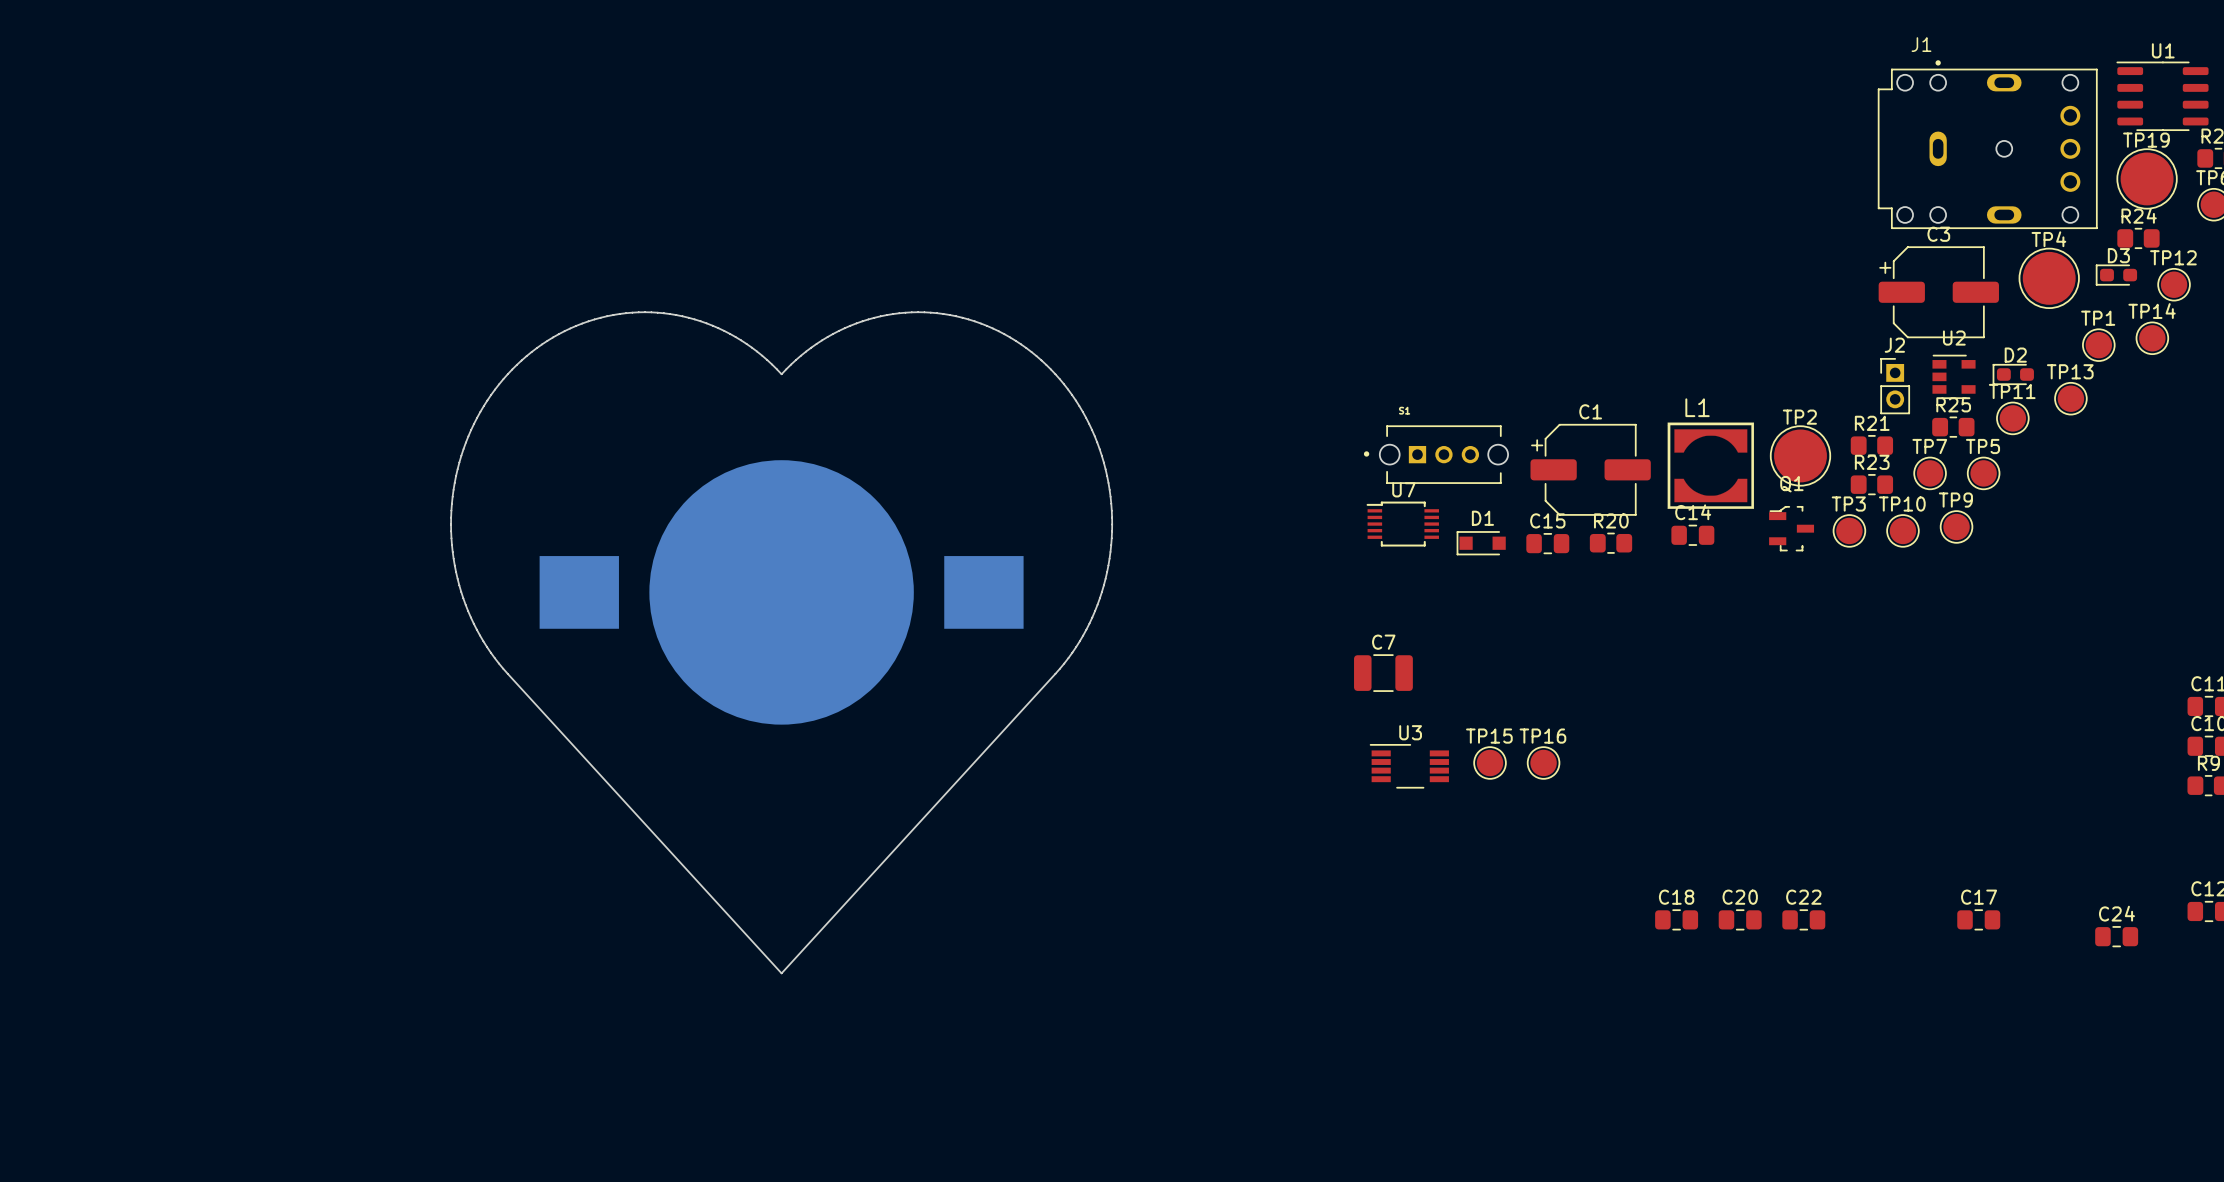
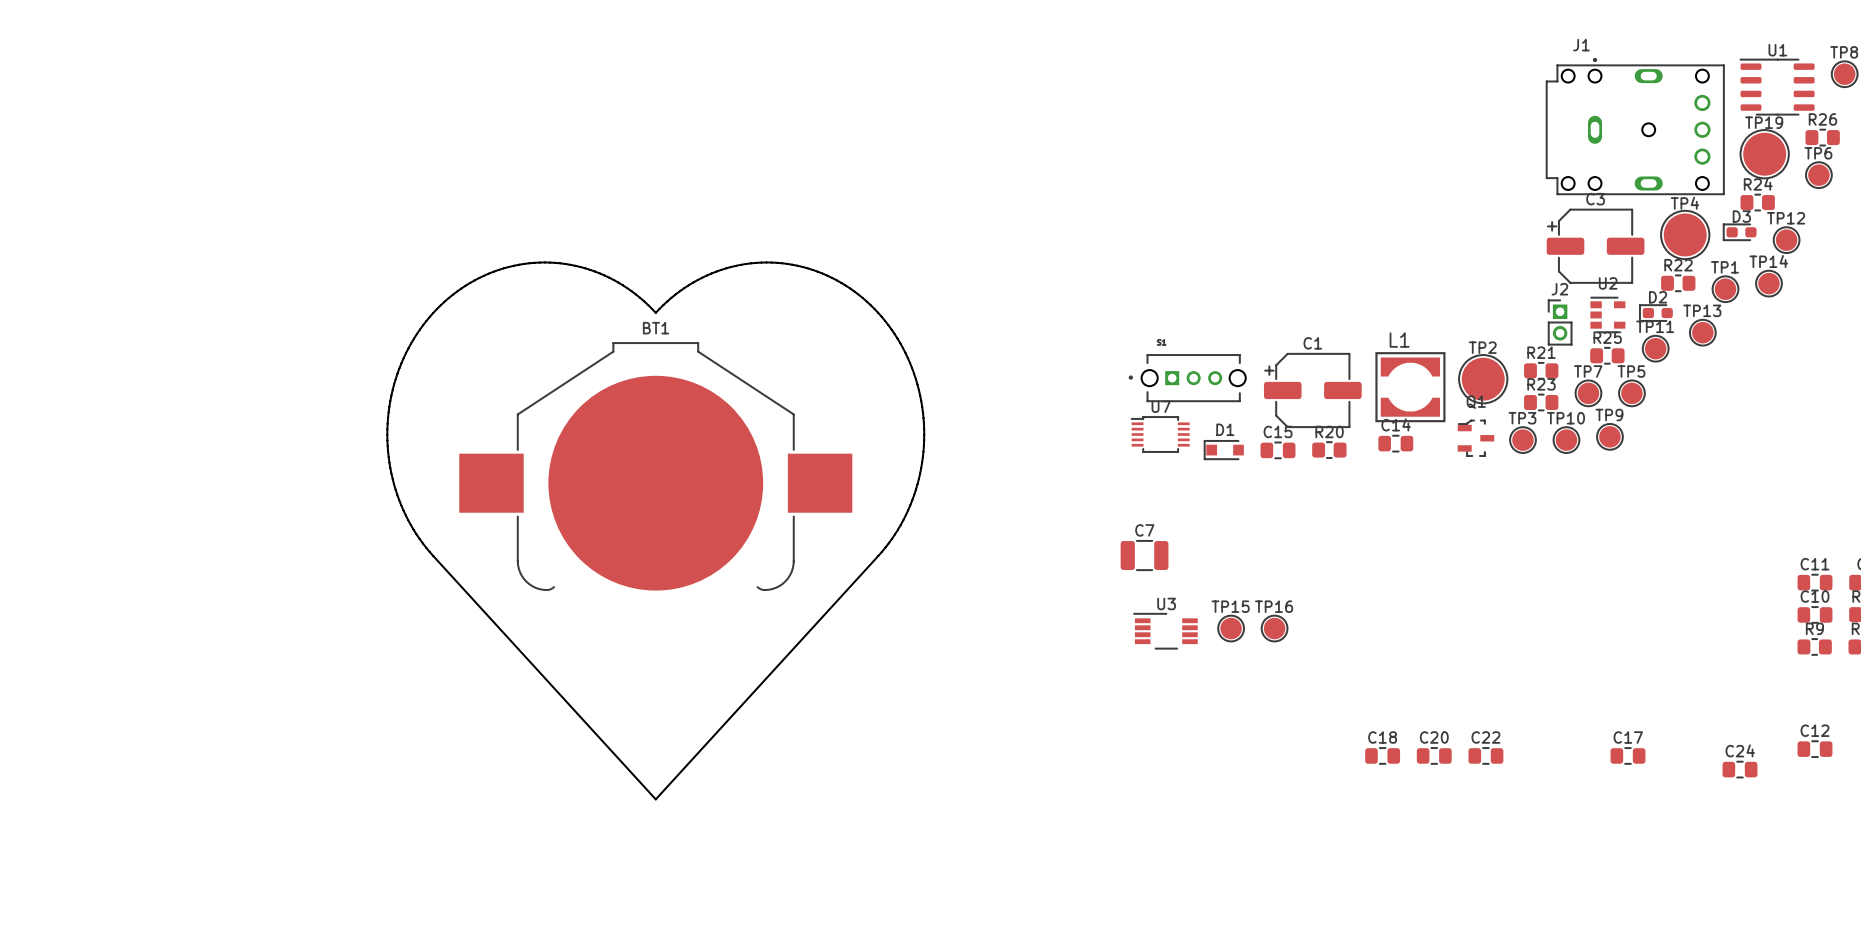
R22: none -> (1678, 283)
BT1 side: bottom (781, 592) -> top (655, 466)

